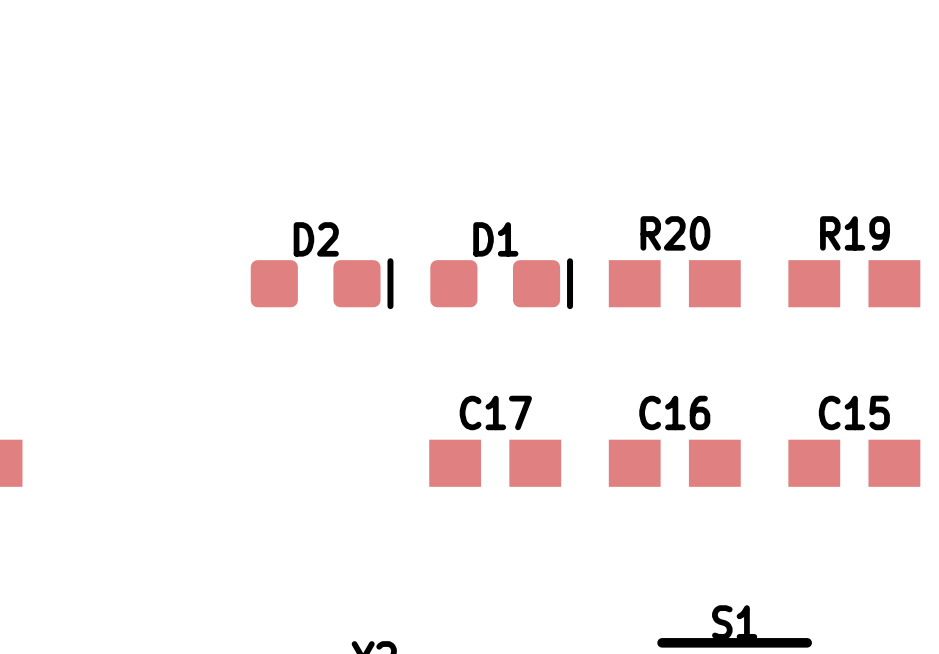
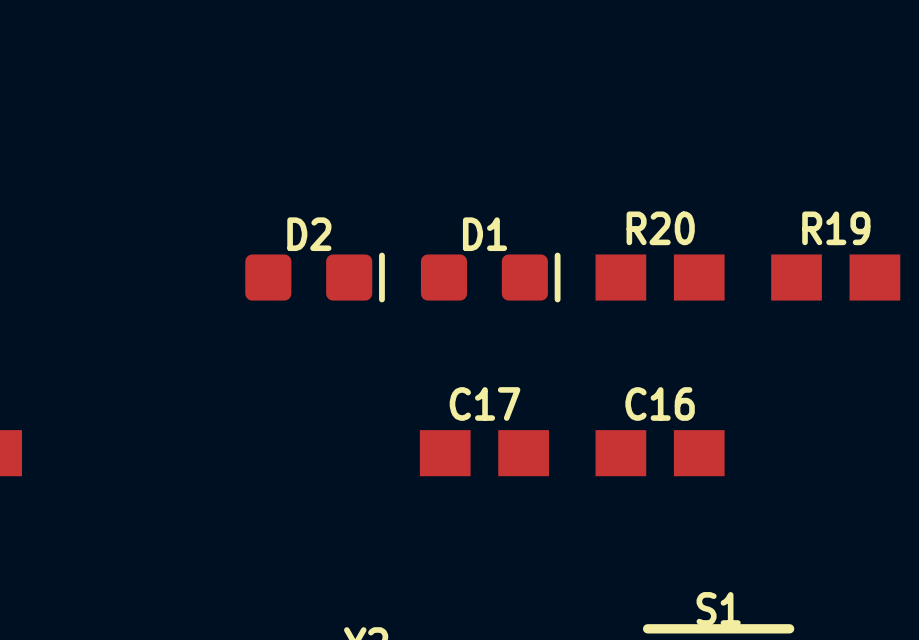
C15: (854, 463) -> none

